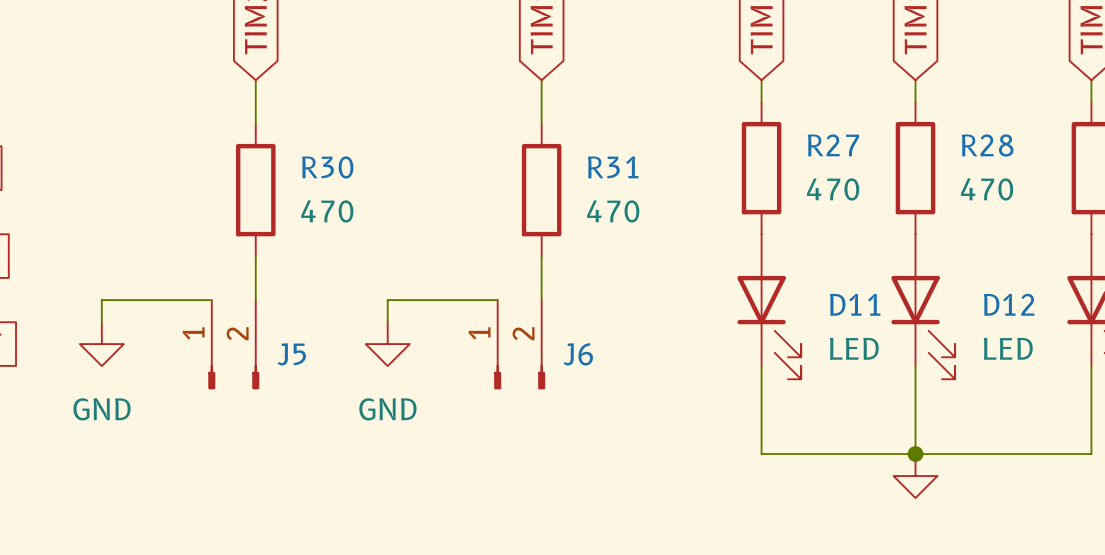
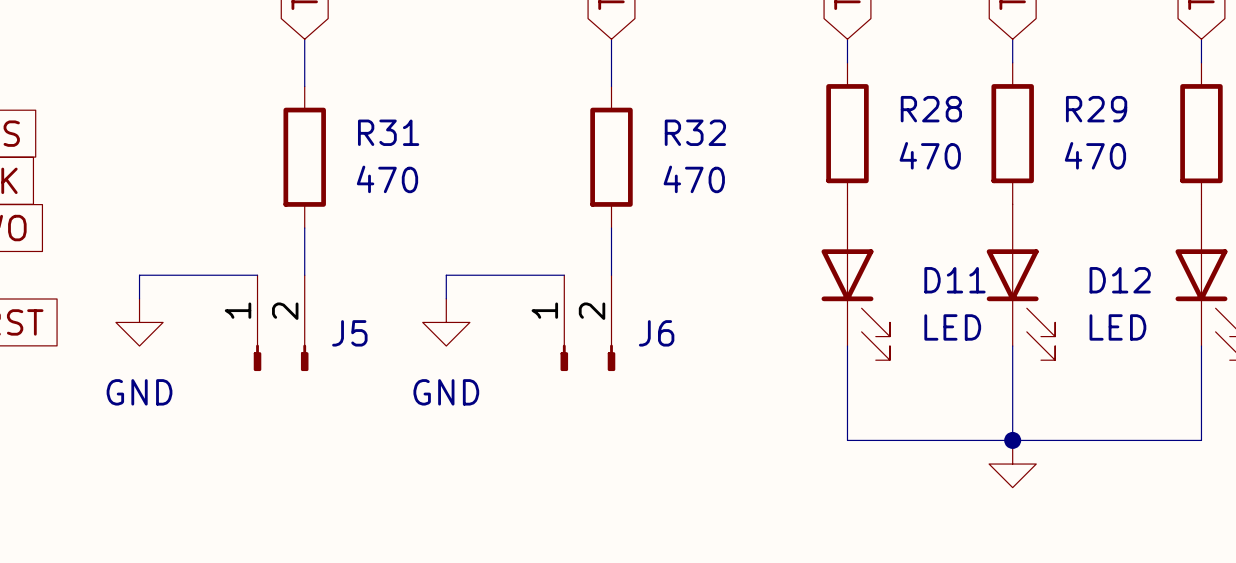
R27 name: R27 (833, 145) -> R28 (931, 109)
R28 name: R28 (987, 145) -> R29 (1096, 109)
R30 name: R30 (327, 167) -> R31 (388, 132)
R31 name: R31 (613, 167) -> R32 (695, 132)

